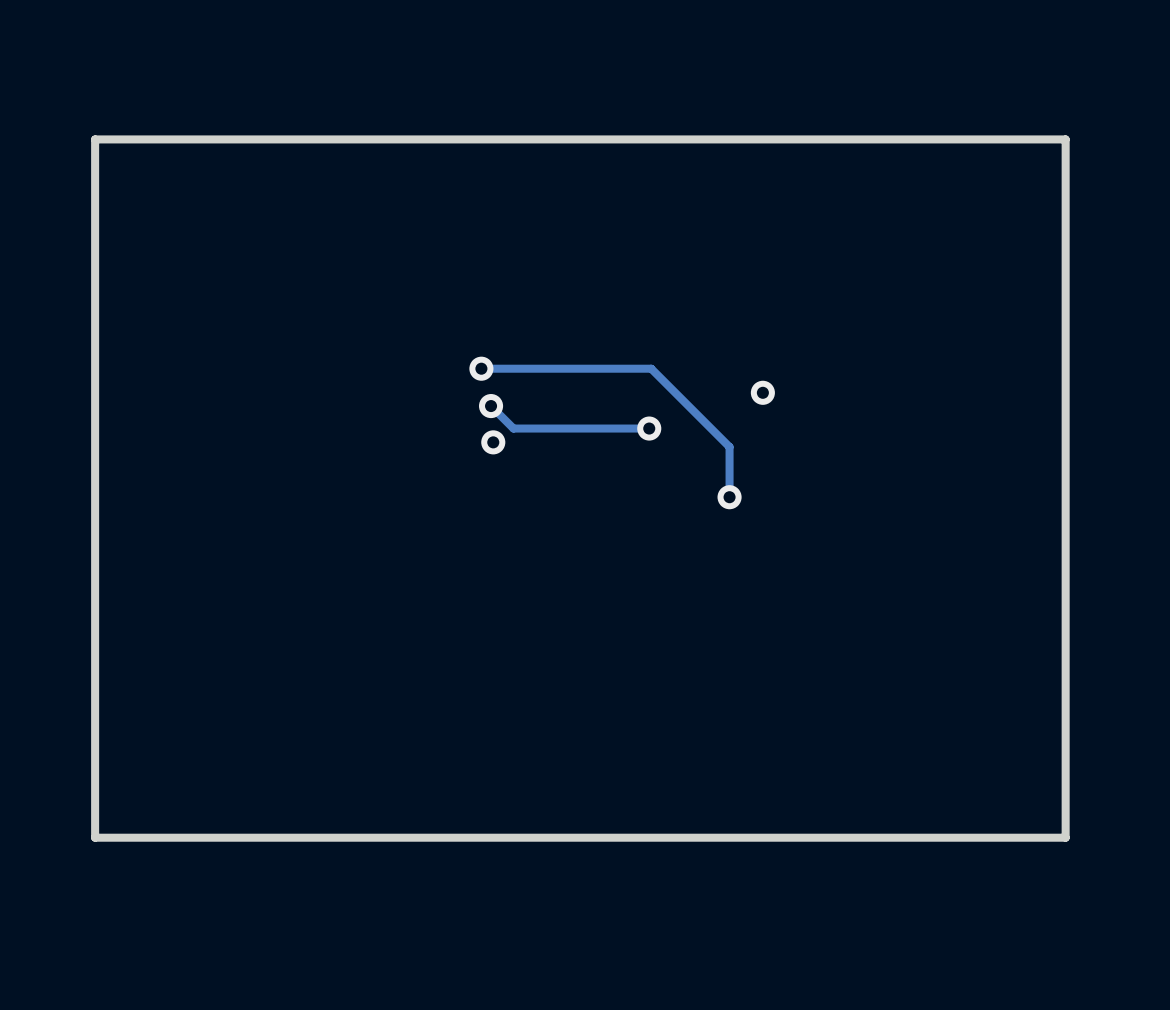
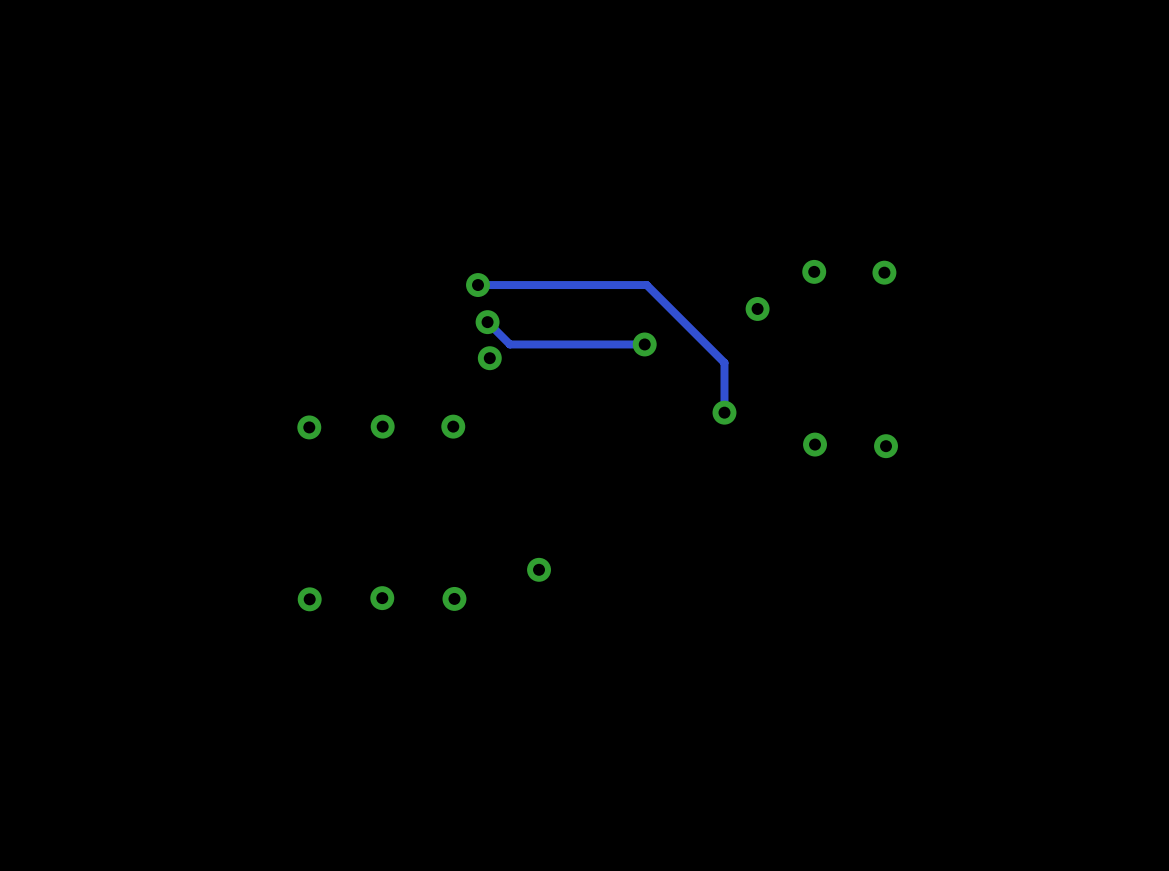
board edge: (1065, 139) (95, 139) (95, 837) (1065, 837) (1065, 139) -> none
via: none -> (814, 271)
via: none -> (884, 272)
via: none -> (382, 426)
via: none -> (453, 426)
via: none -> (309, 427)
via: none -> (815, 444)
via: none -> (886, 446)
via: none -> (539, 569)
via: none -> (382, 598)
via: none -> (454, 598)
via: none -> (309, 599)

